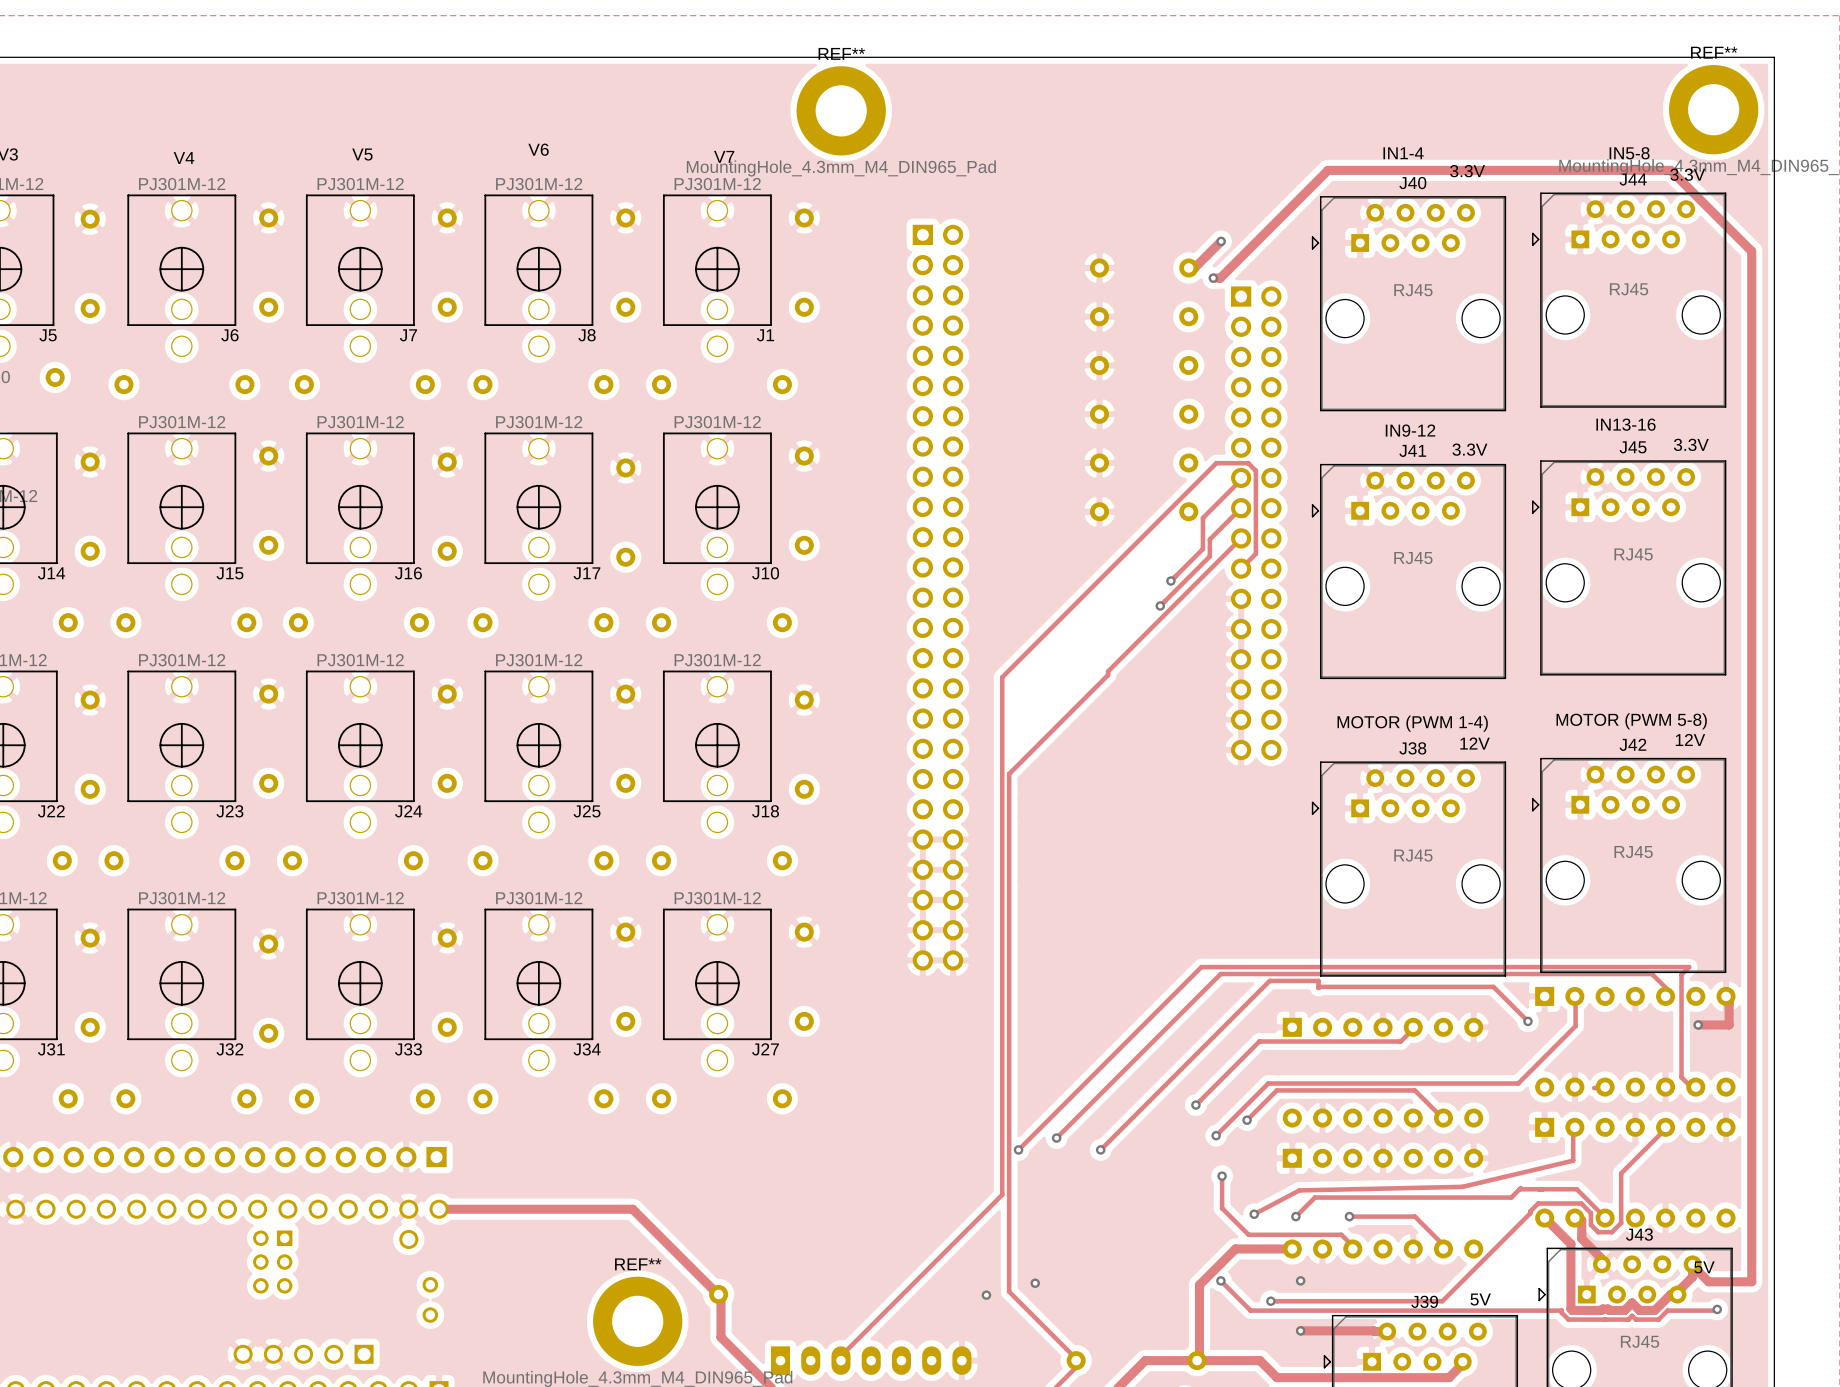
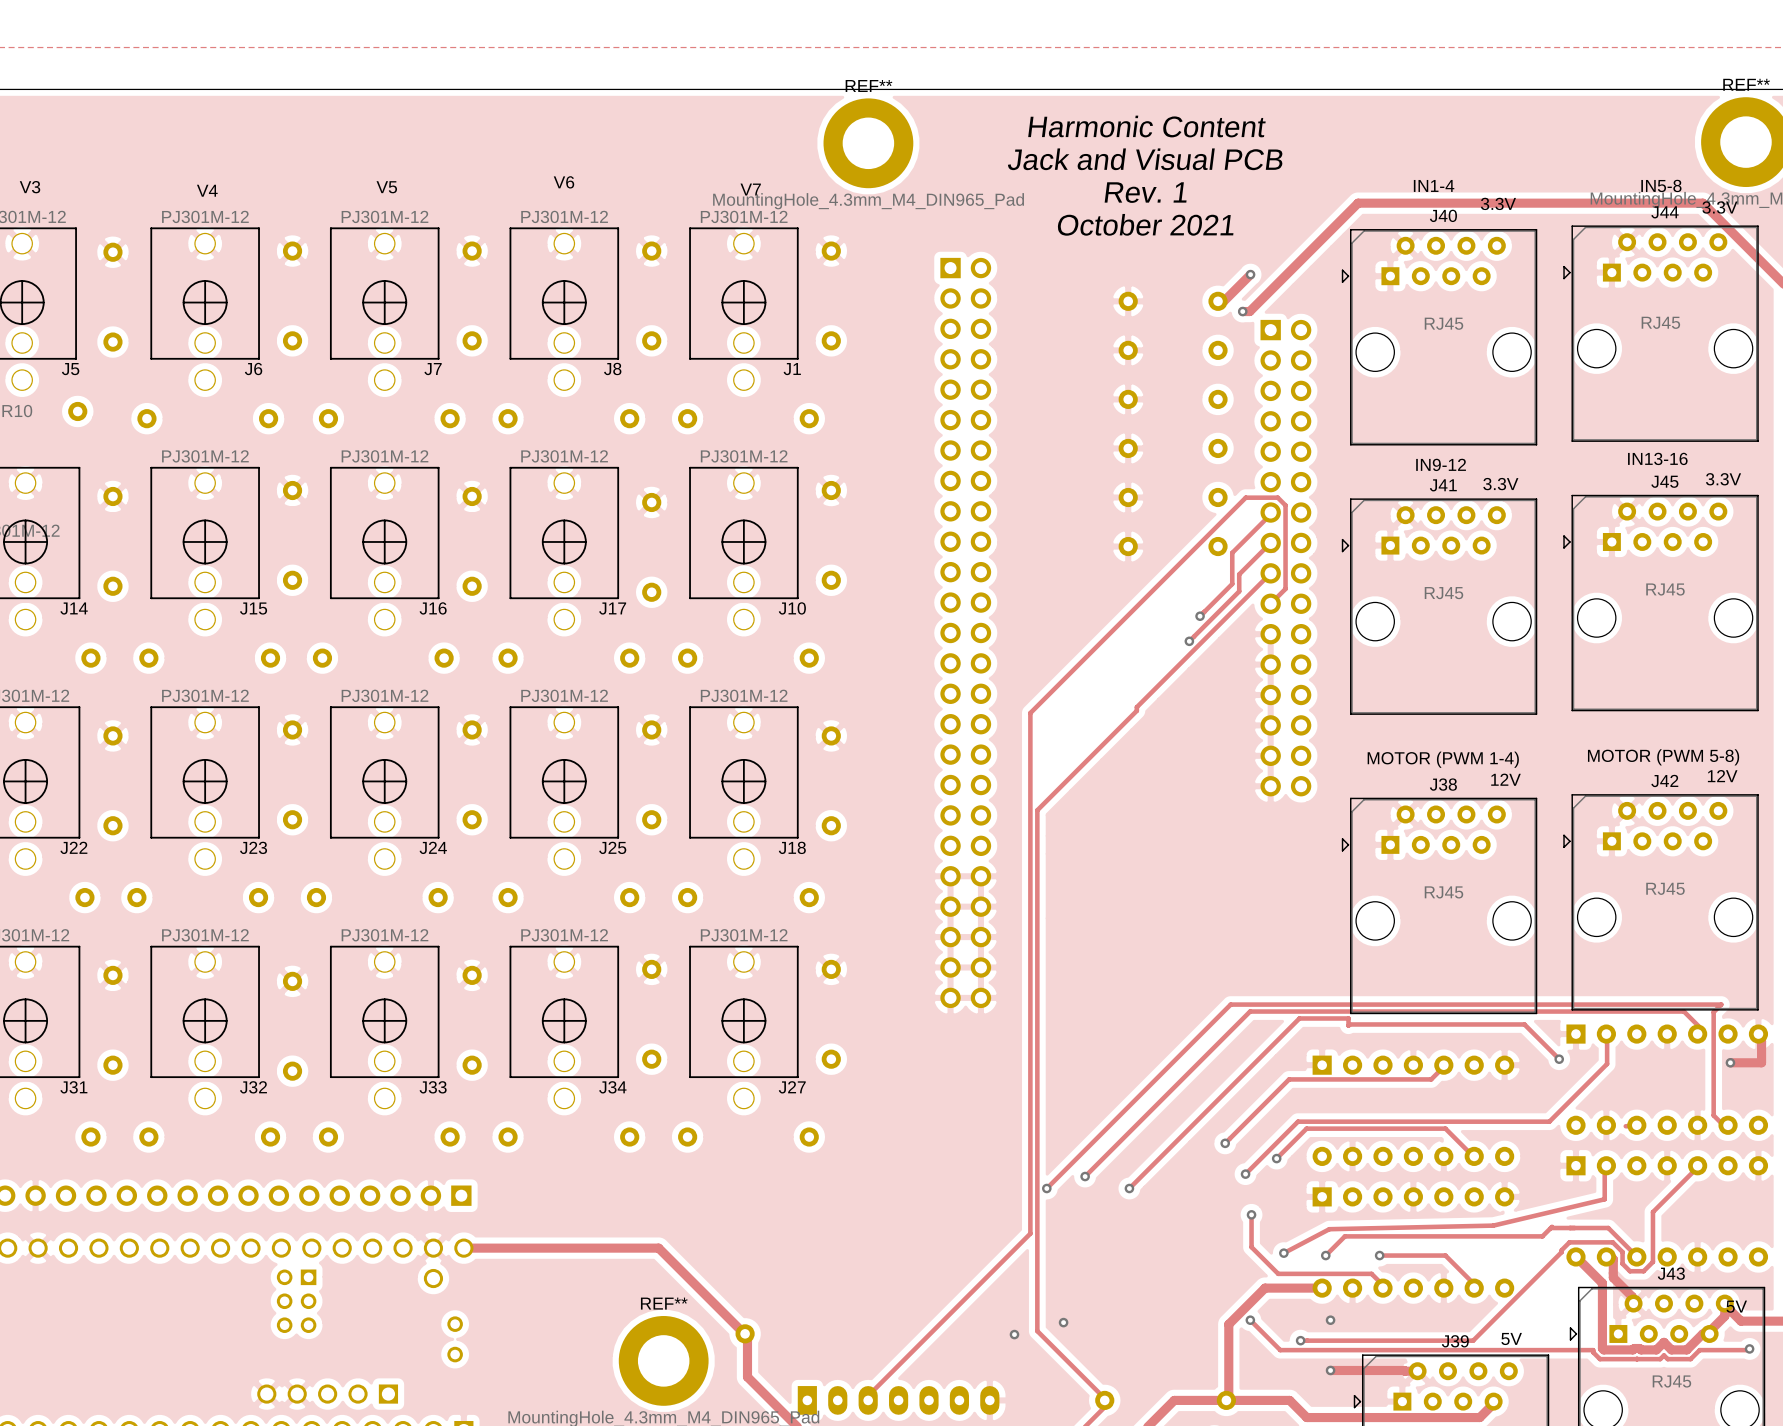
text: none -> Harmonic Content (1146, 126)
text: none -> Jack and Visual PCB (1145, 159)
text: none -> Rev. 1 (1145, 192)
text: none -> October 2021 (1145, 224)

